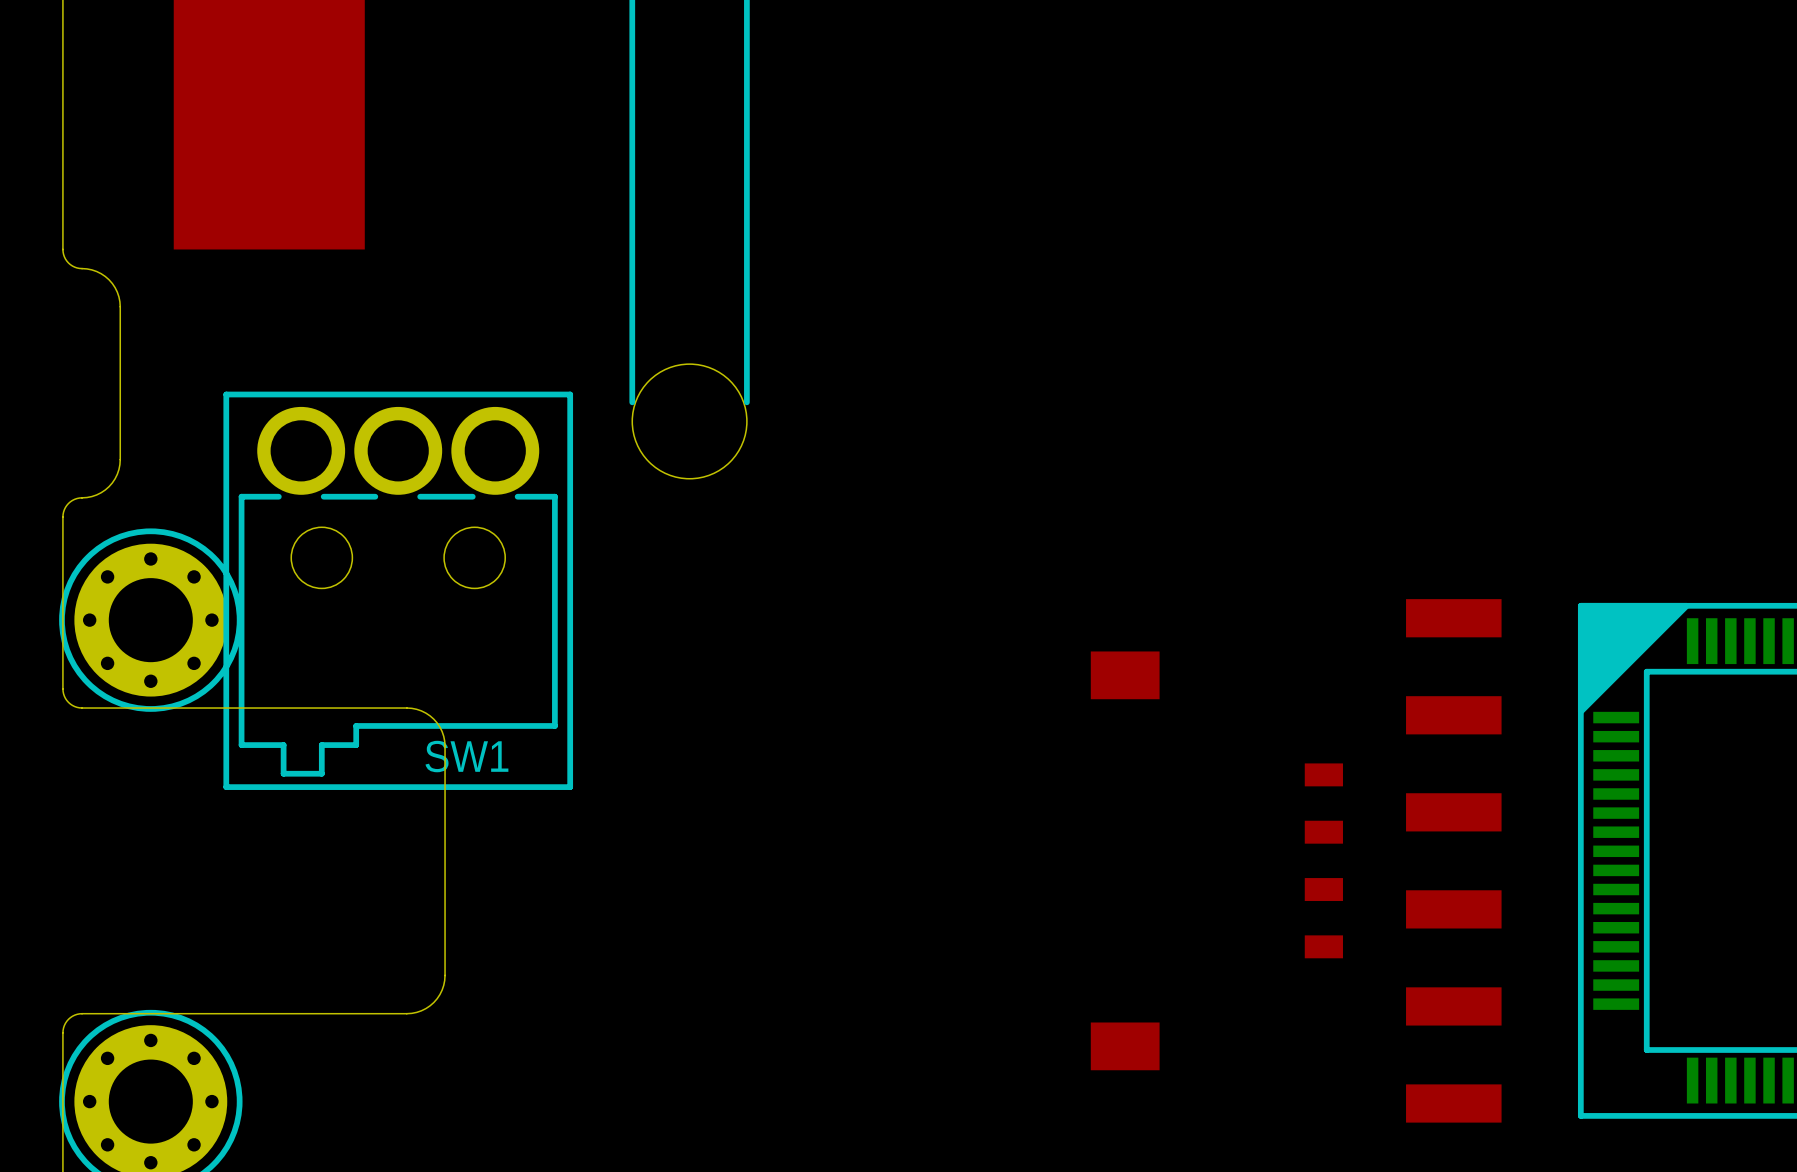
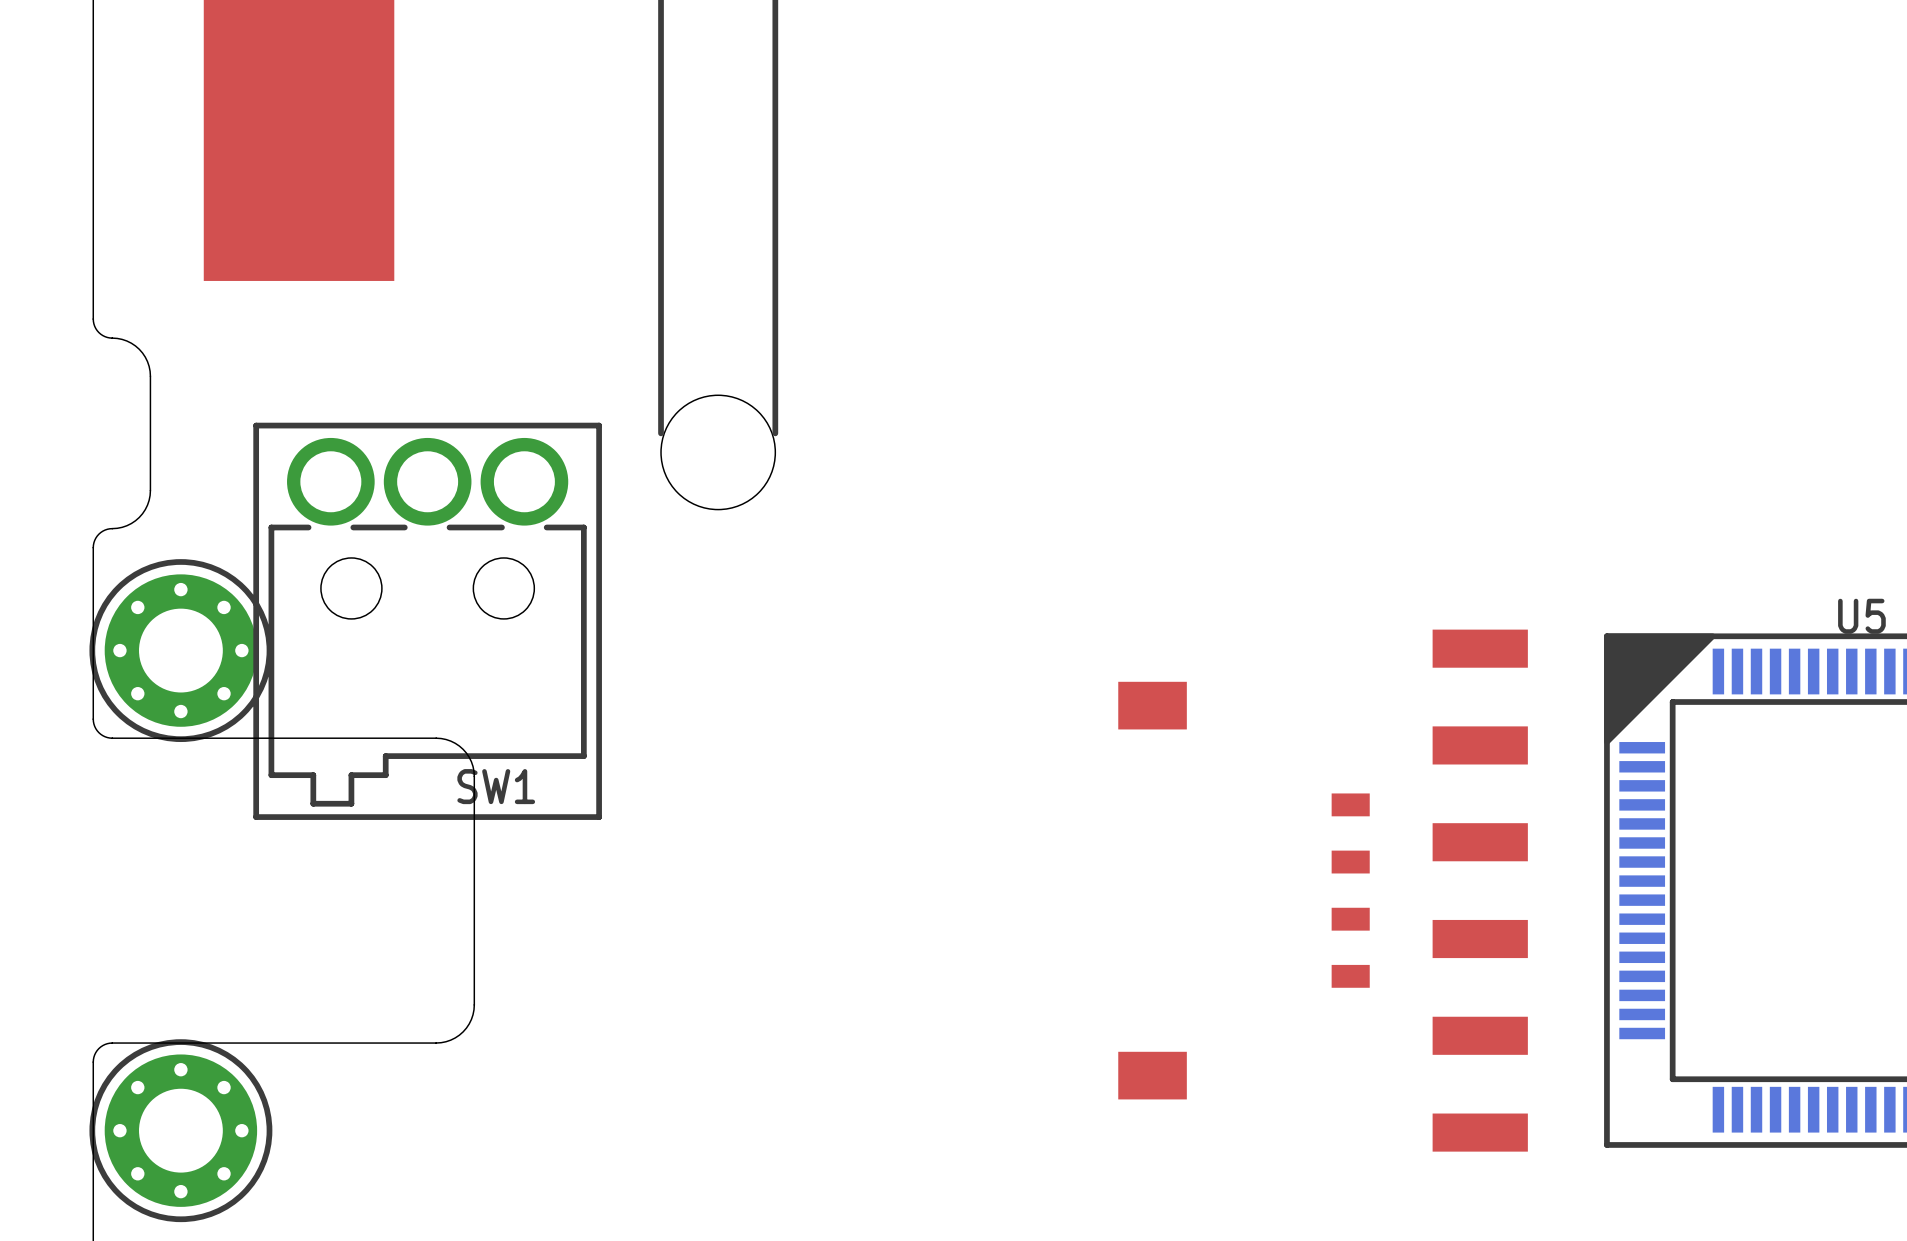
board edge: (62, 249) (65, 259) (70, 264) (101, 273) (115, 287) (119, 301) (120, 345) -> (93, 280) (93, 319) (95, 328) (105, 336) (122, 339) (135, 345) (147, 361) (150, 376)

